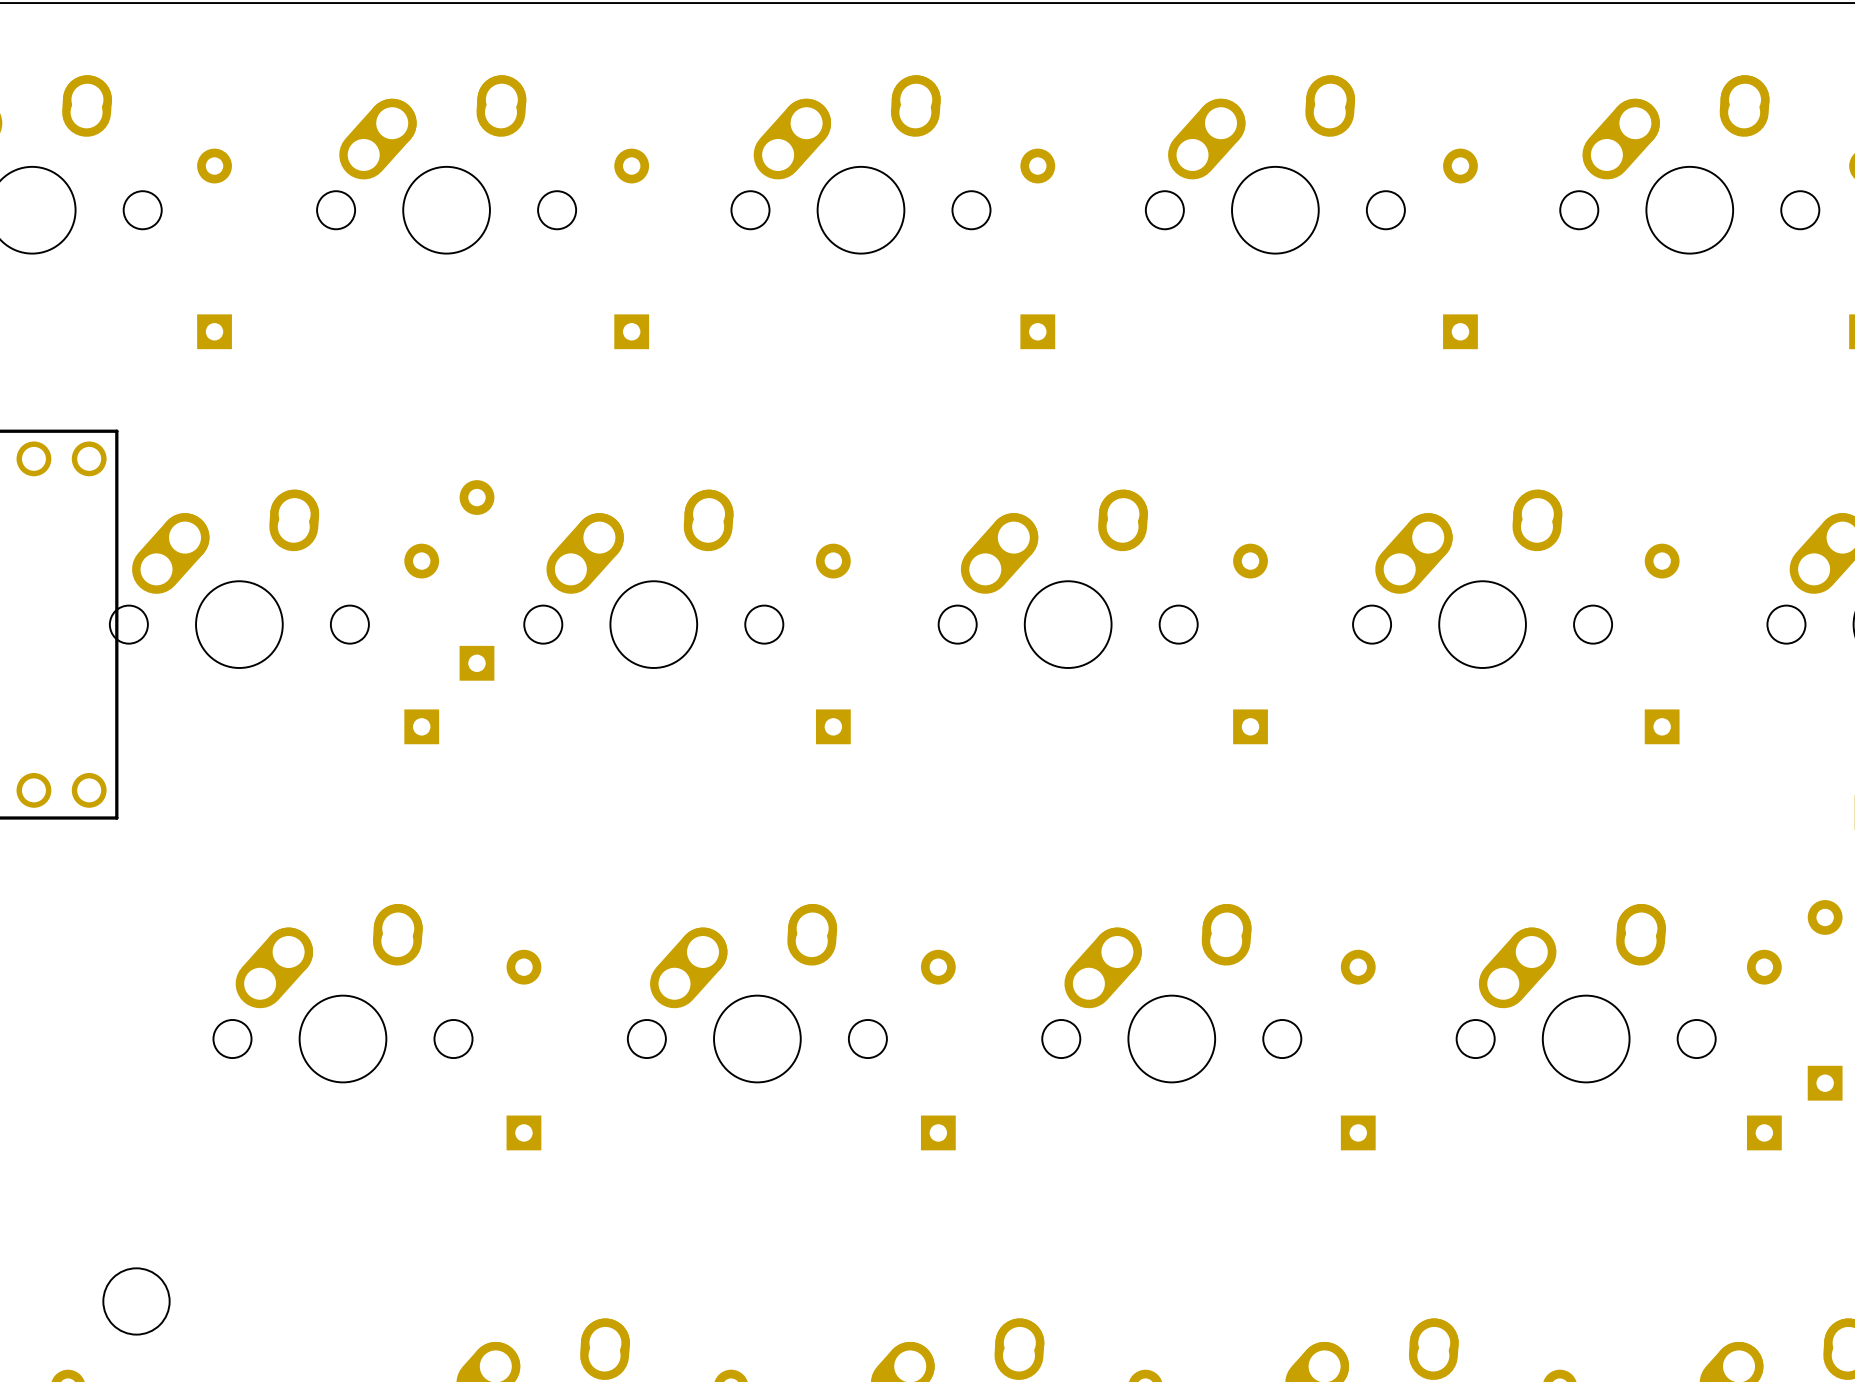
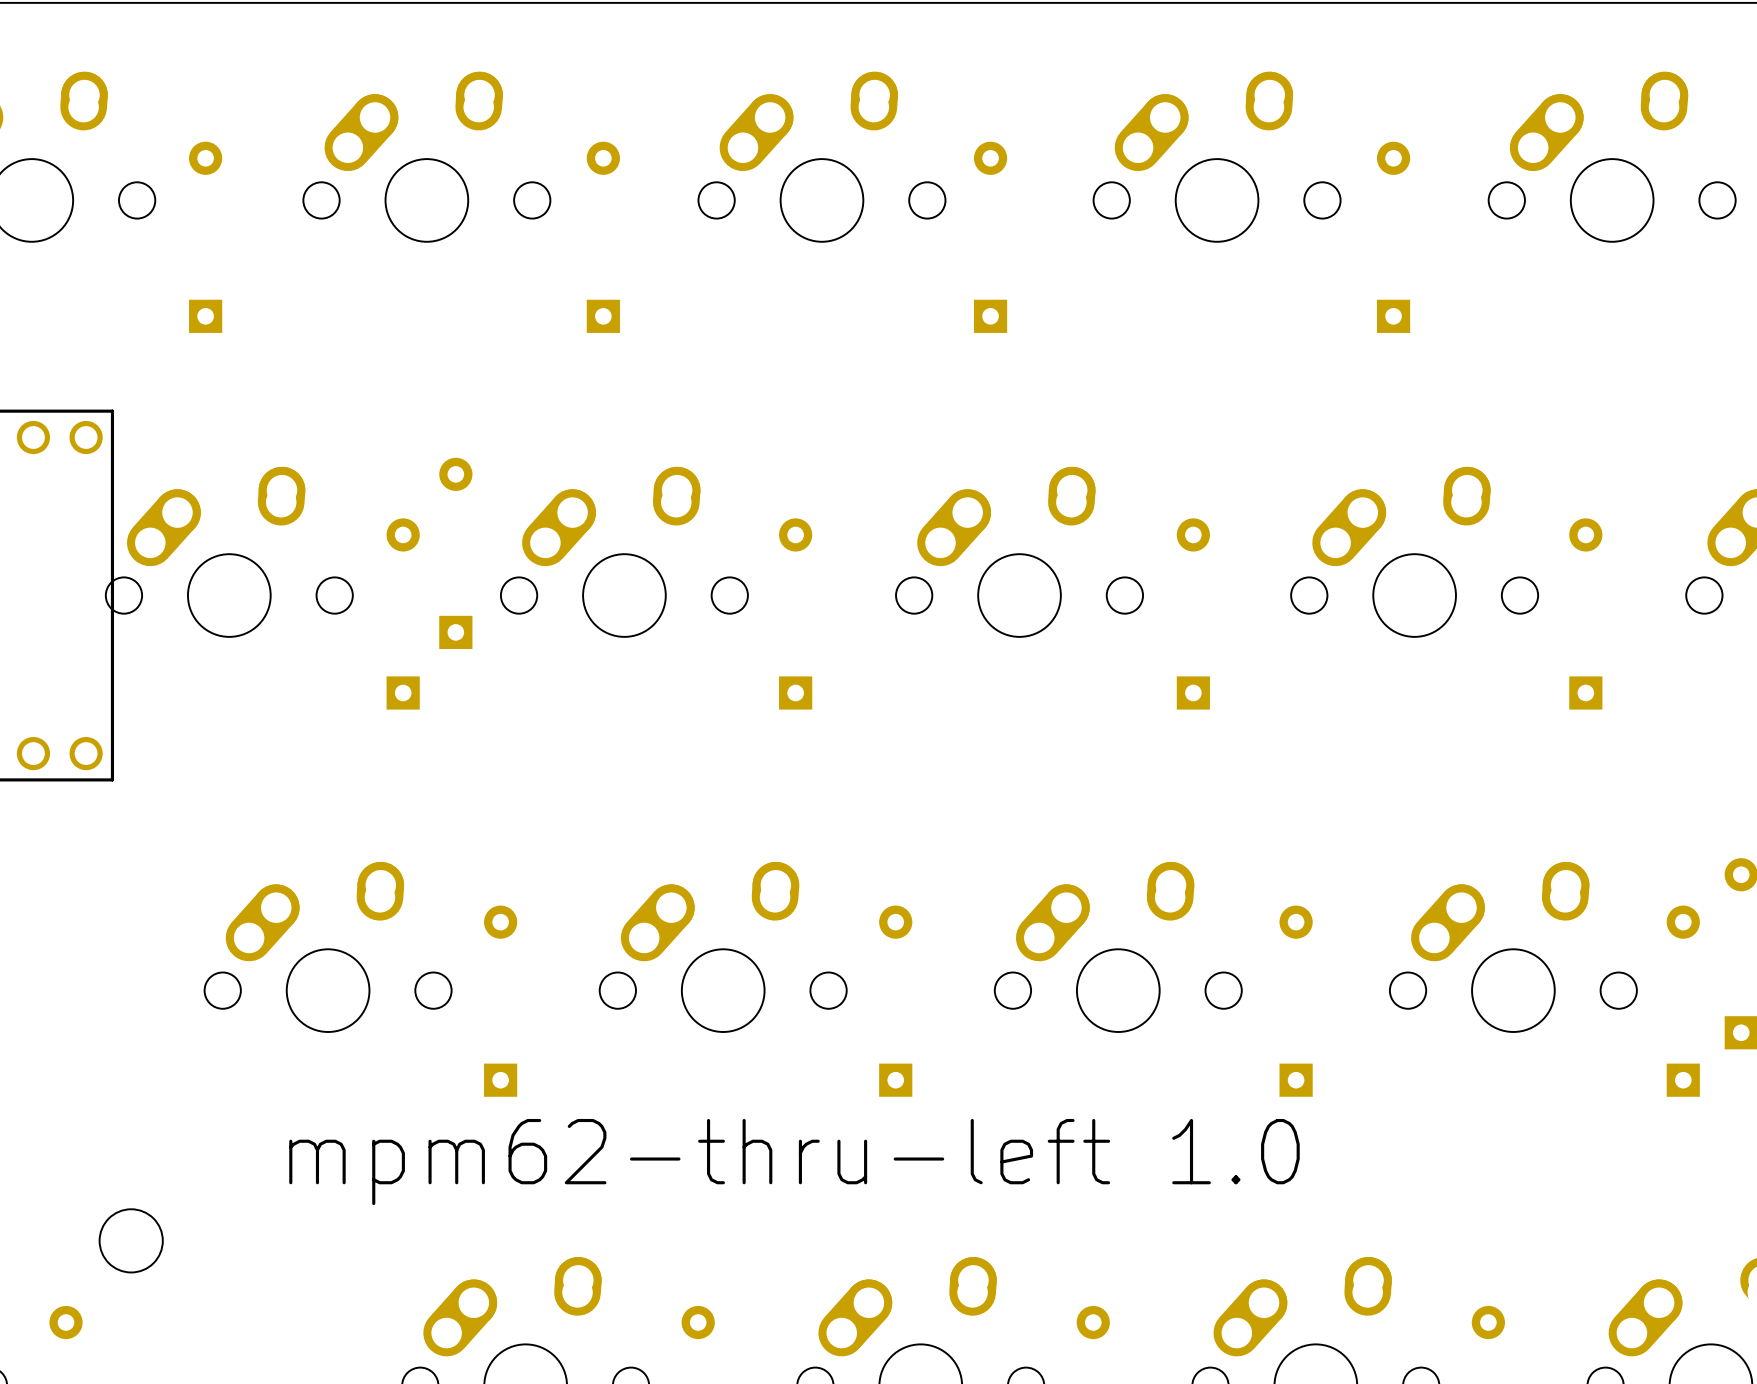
text: none -> mpm62-thru-left 1.0 (794, 1161)

